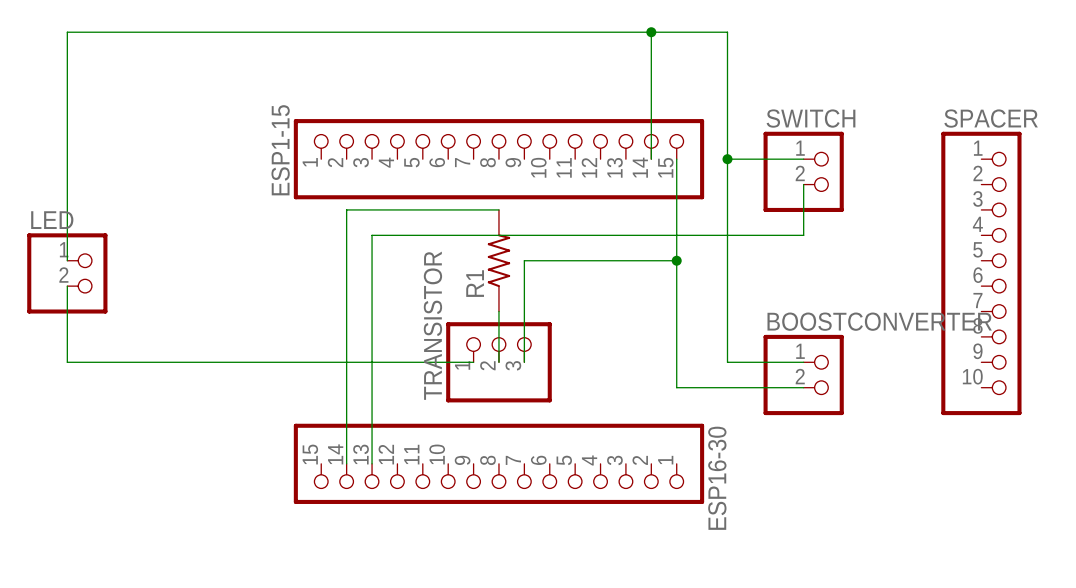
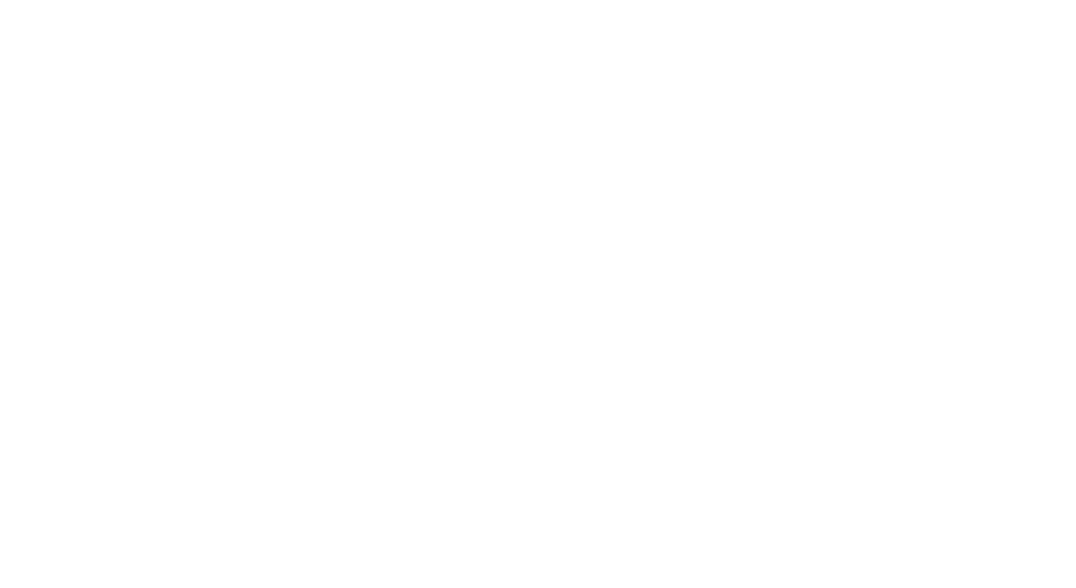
wire: (651, 32) (651, 159) -> none
junction: (651, 32) -> none
ESP1-15: (498, 159) -> none
wire: (676, 159) (676, 387) (803, 387) -> none
wire: (727, 159) (803, 159) -> none
junction: (727, 159) -> none
SWITCH: (803, 171) -> none
wire: (803, 184) (803, 235) (372, 235) (372, 463) -> none
wire: (498, 209) (346, 209) (346, 463) -> none
wire: (67, 260) (67, 32) (727, 32) (727, 362) (803, 362) -> none
R1: (498, 260) -> none
wire: (676, 260) (524, 260) (524, 362) -> none
junction: (676, 260) -> none
LED: (67, 273) -> none
SPACER: (981, 273) -> none
wire: (67, 286) (67, 362) (473, 362) -> none
wire: (498, 311) (498, 362) -> none
TRANSISTOR: (498, 362) -> none
BOOSTCONVERTER: (803, 374) -> none
ESP16-30: (498, 463) -> none

